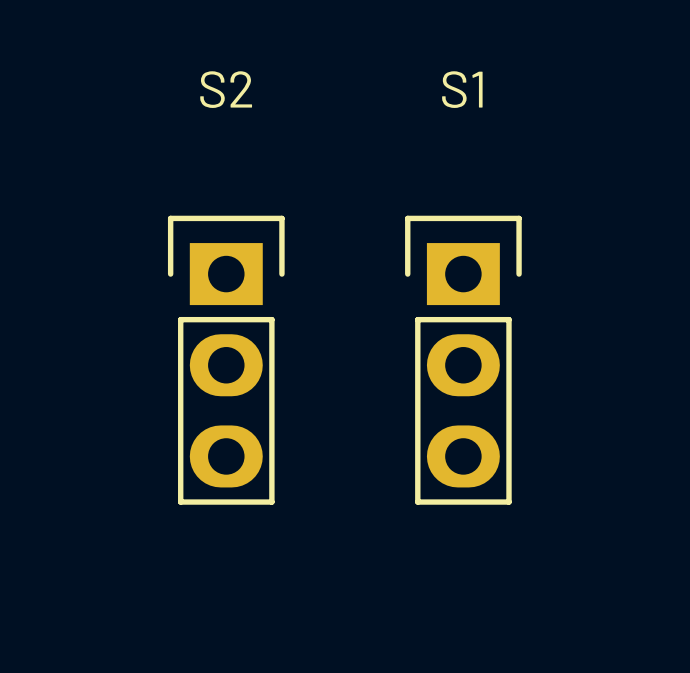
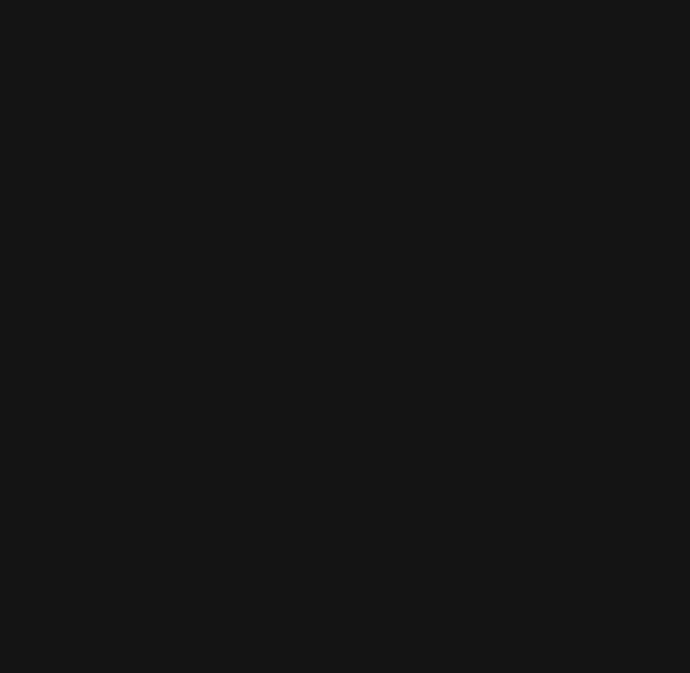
S2: (226, 360) -> none
S1: (463, 360) -> none

